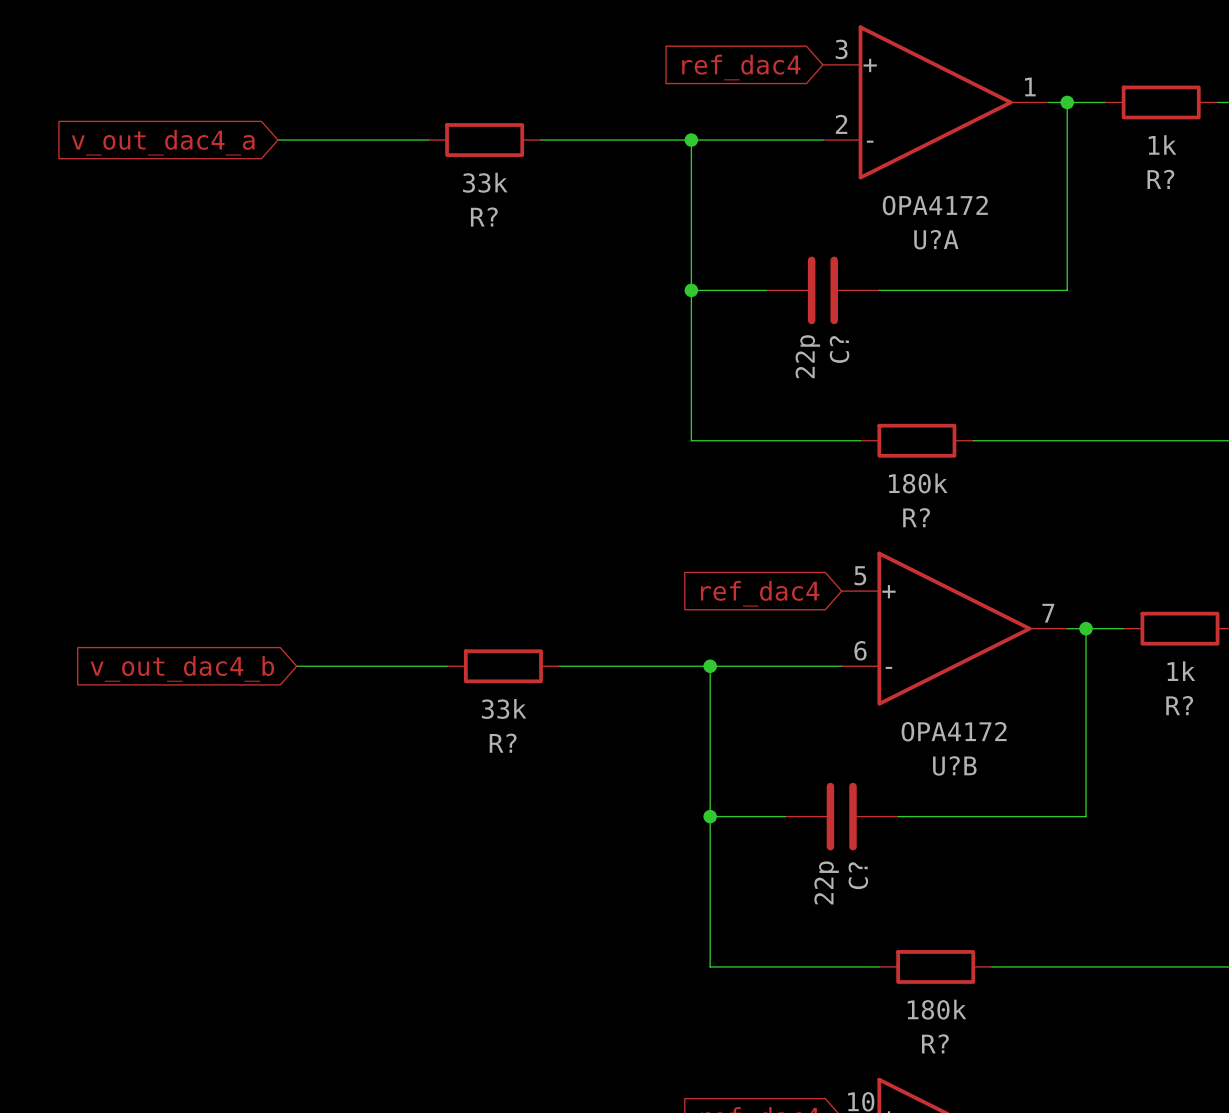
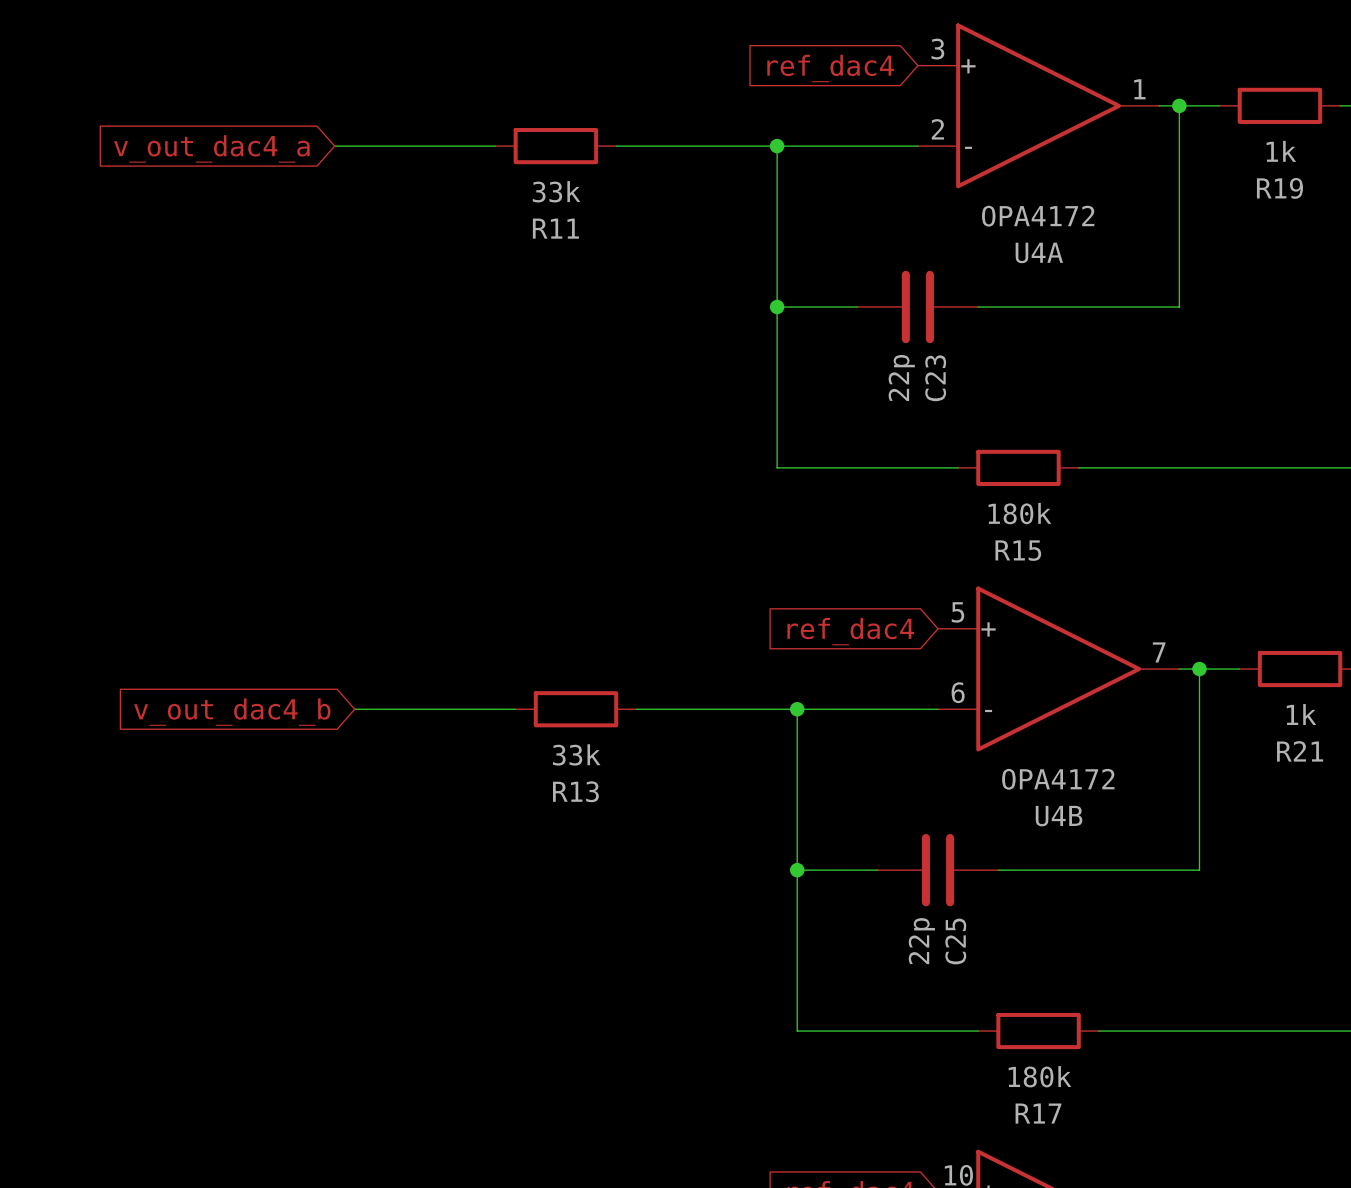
R? name: R? (1160, 179) -> R19 (1279, 188)
R? name: R? (484, 216) -> R11 (555, 228)
U?A name: U?A (936, 239) -> U4A (1039, 252)
C? name: C? (839, 349) -> C23 (935, 378)
R? name: R? (916, 517) -> R15 (1018, 550)
R? name: R? (1179, 705) -> R21 (1300, 751)
R? name: R? (503, 743) -> R13 (575, 791)
U?B name: U?B (954, 765) -> U4B (1059, 816)
C? name: C? (858, 875) -> C25 (955, 941)
R? name: R? (935, 1043) -> R17 (1038, 1113)

